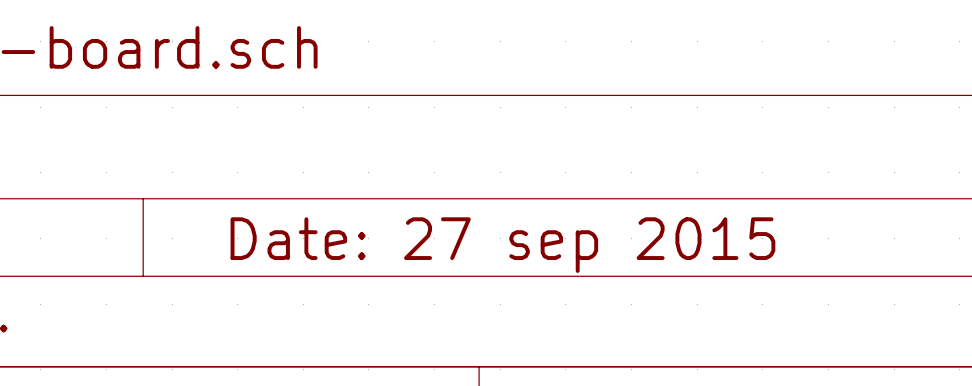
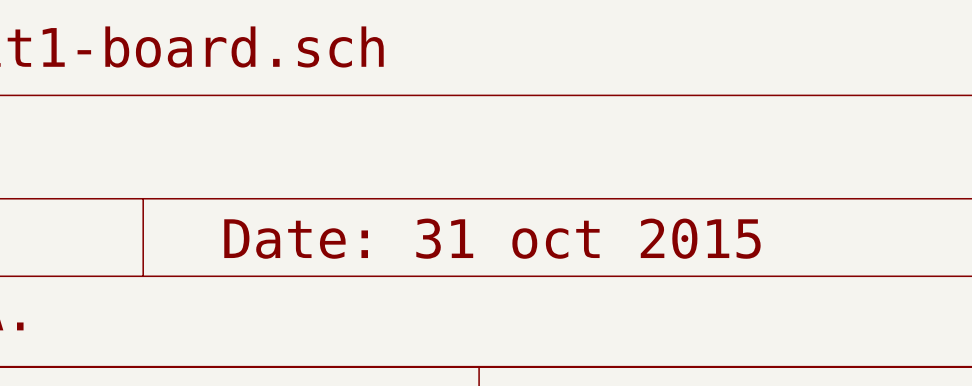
title block: Date: 27 sep 2015 (502, 245) -> Date: 31 oct 2015 (492, 238)

